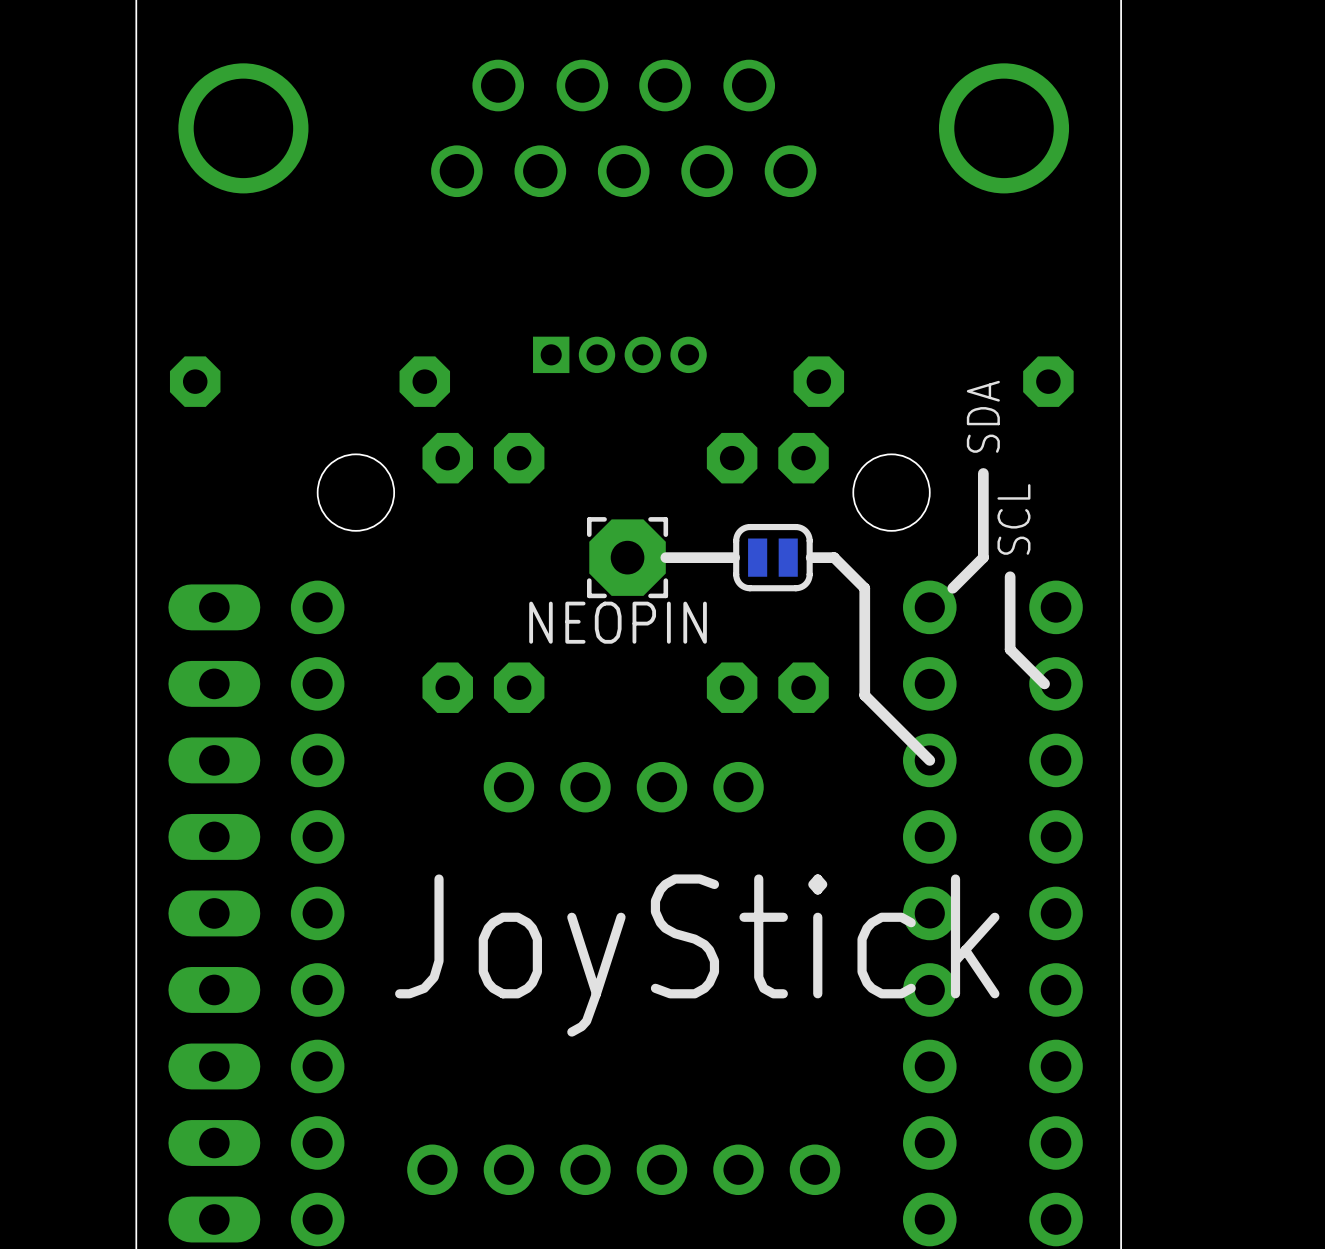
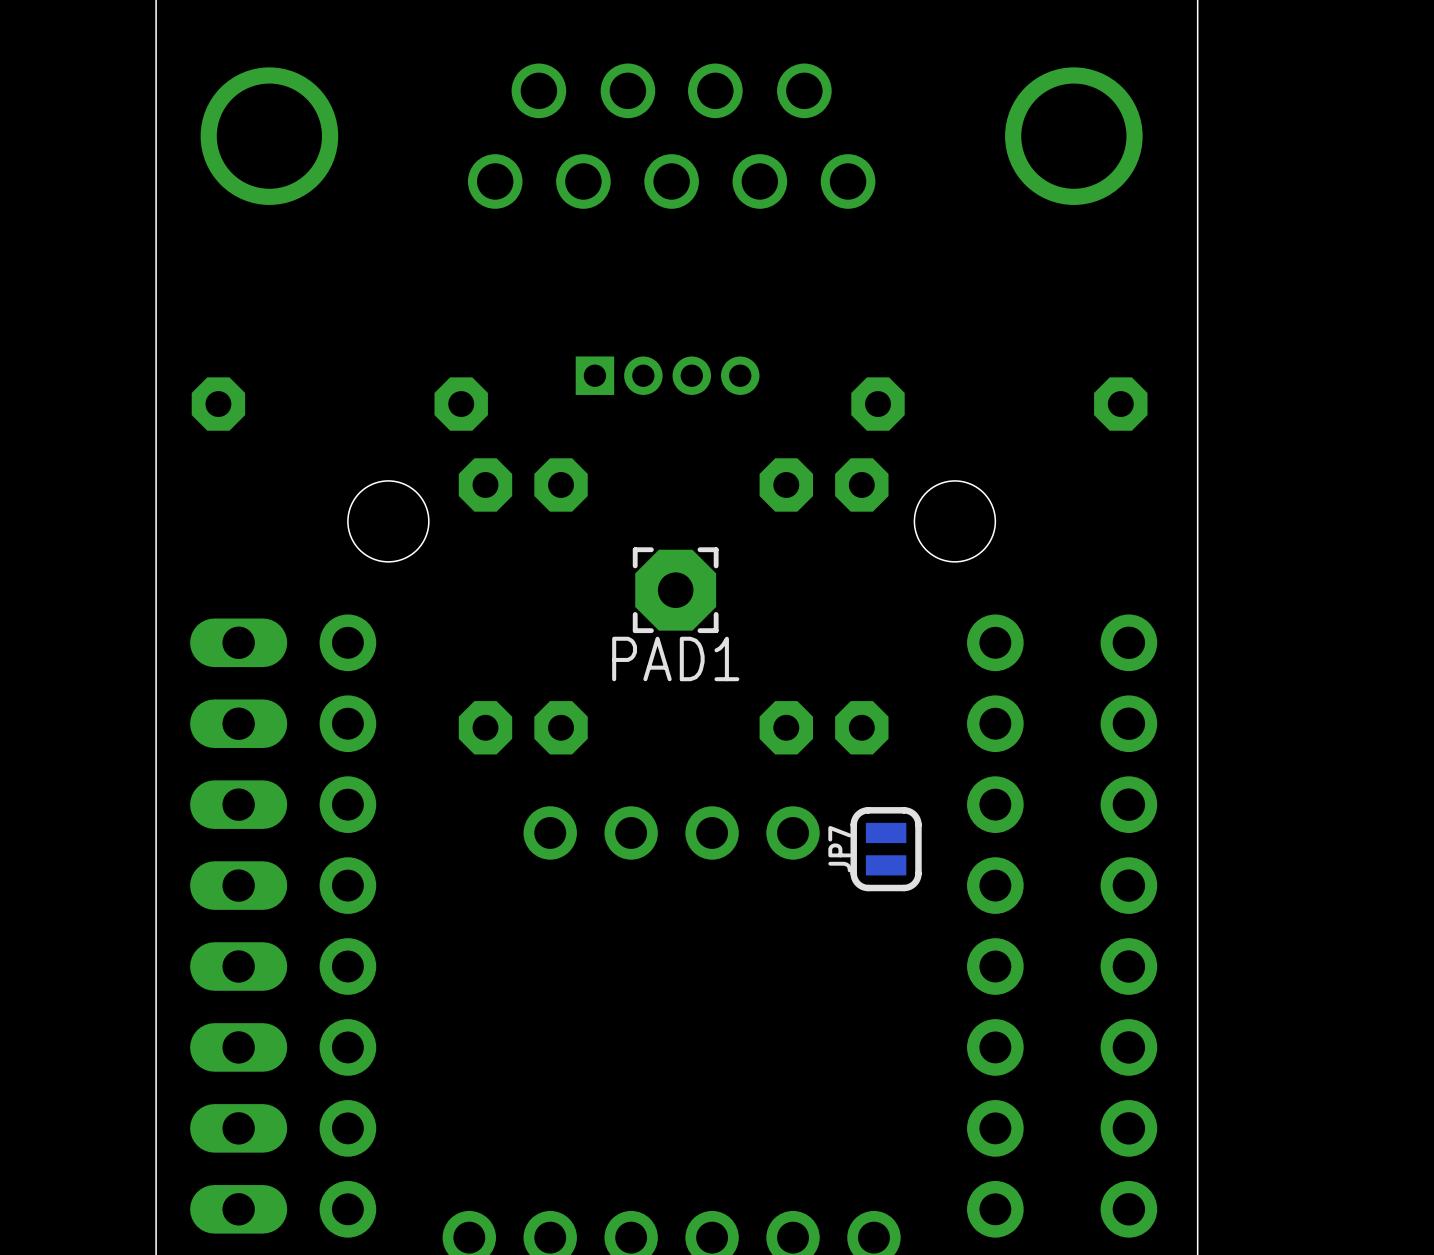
text: SDA (983, 416) -> none
line: (983, 473) (983, 557) (952, 588) -> none
text: SCL (1013, 519) -> none
line: (734, 557) (665, 557) -> none
part: (772, 557) -> none
line: (811, 557) (834, 557) (864, 588) (864, 695) (929, 760) -> none
line: (1010, 576) (1010, 649) (1044, 683) -> none
NEOPIN name: NEOPIN (618, 622) -> PAD1 (675, 658)
JP7: none -> (886, 849)
text: JoyStick (697, 955) -> none

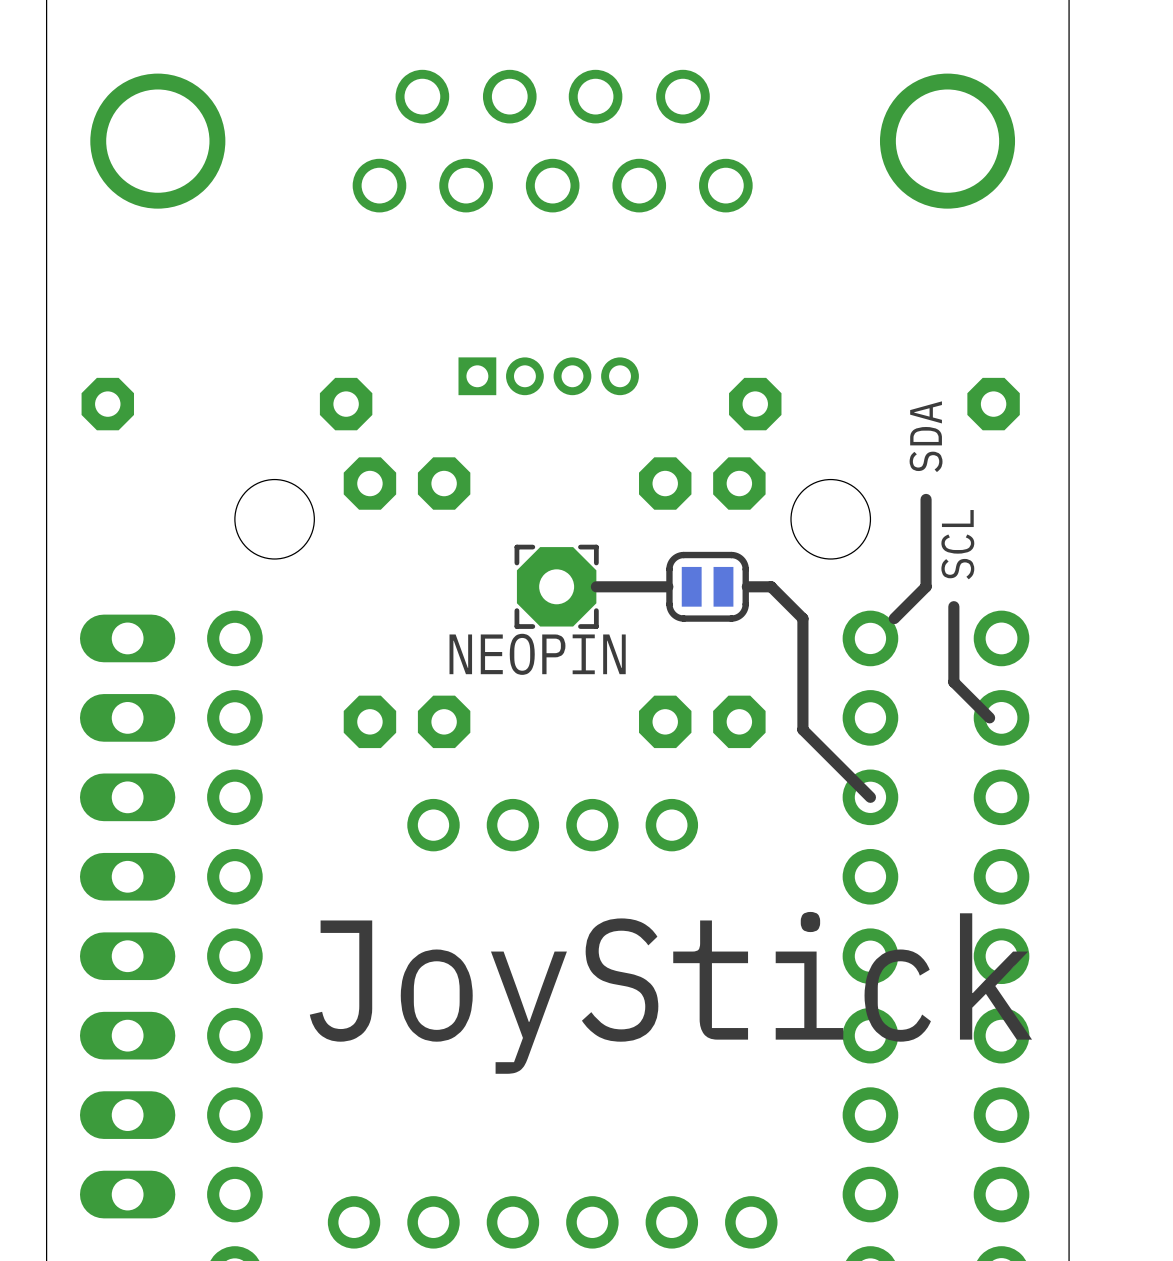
text: none -> SDA (926, 436)
line: none -> (926, 499) (926, 586) (894, 618)
text: none -> SCL (957, 544)
line: none -> (667, 586) (596, 586)
part: none -> (707, 586)
line: none -> (747, 586) (771, 586) (802, 618) (802, 729) (870, 797)
line: none -> (953, 606) (953, 682) (989, 717)
PAD1 name: PAD1 (675, 658) -> NEOPIN (537, 654)
JP7: (886, 849) -> none
text: none -> JoyStick (670, 992)

